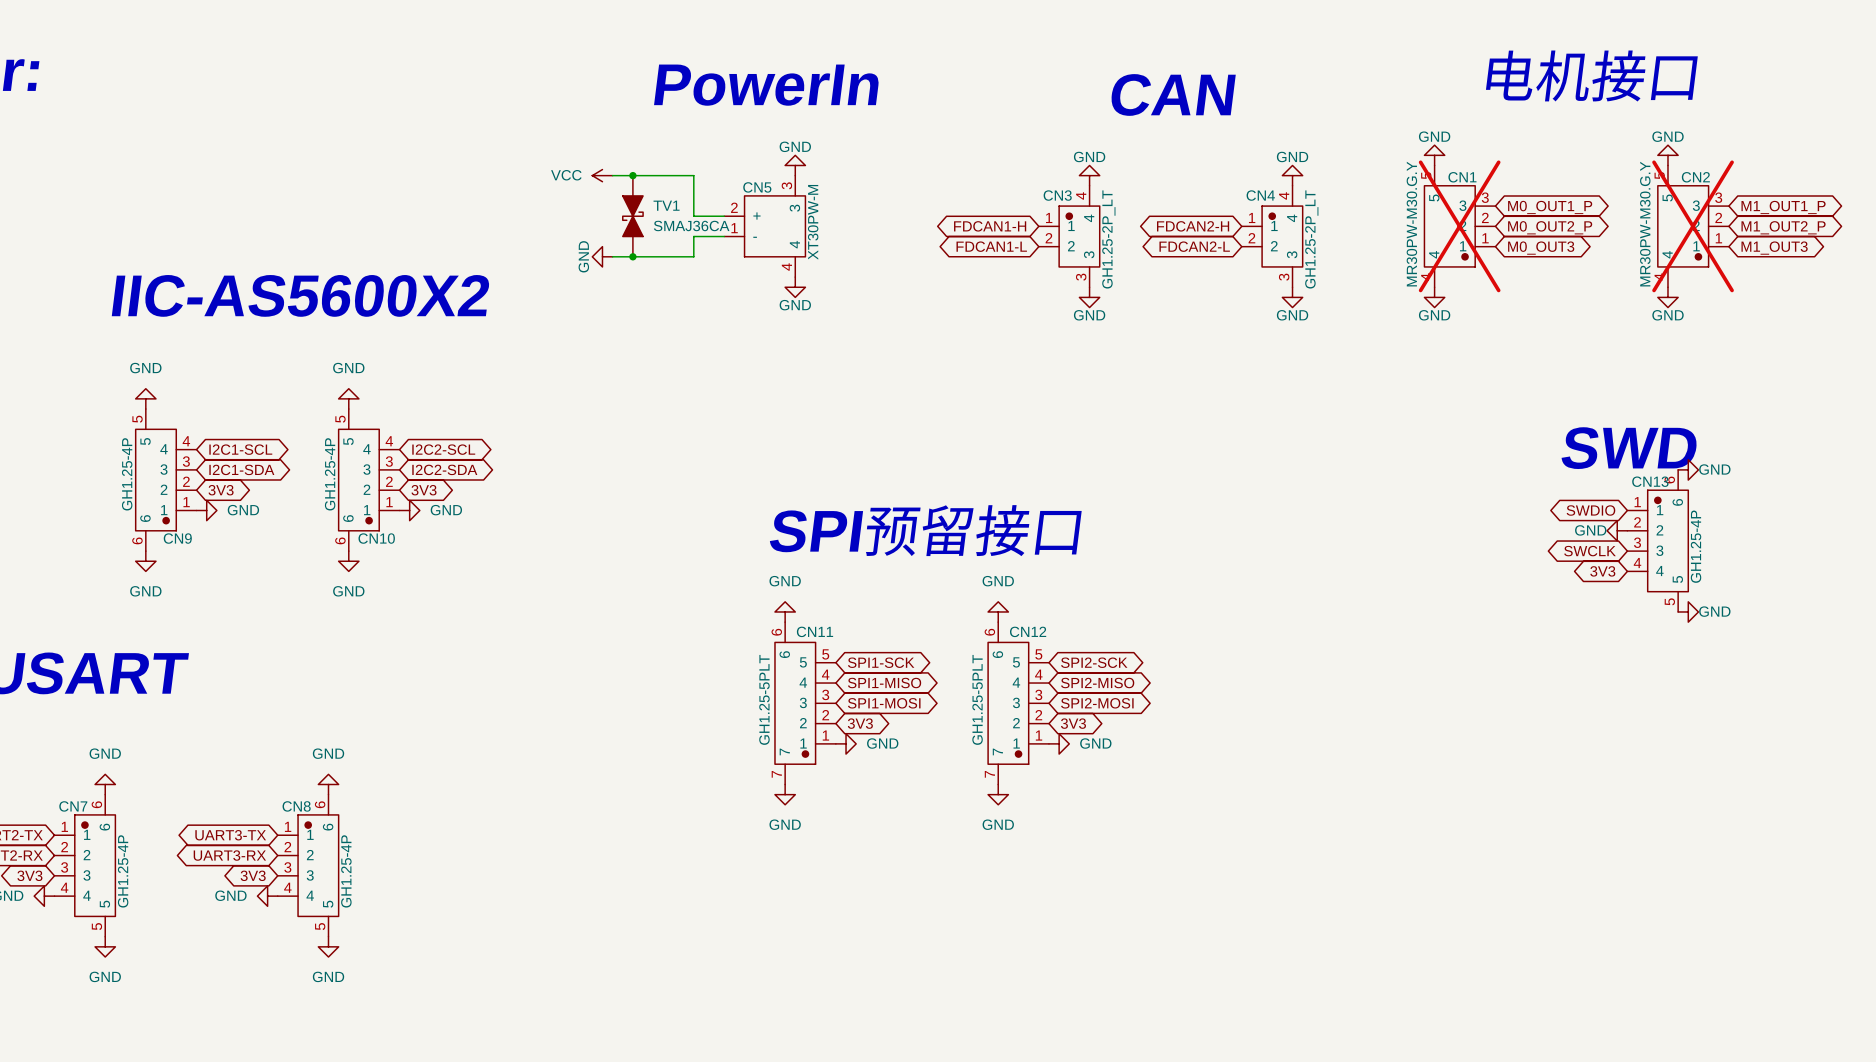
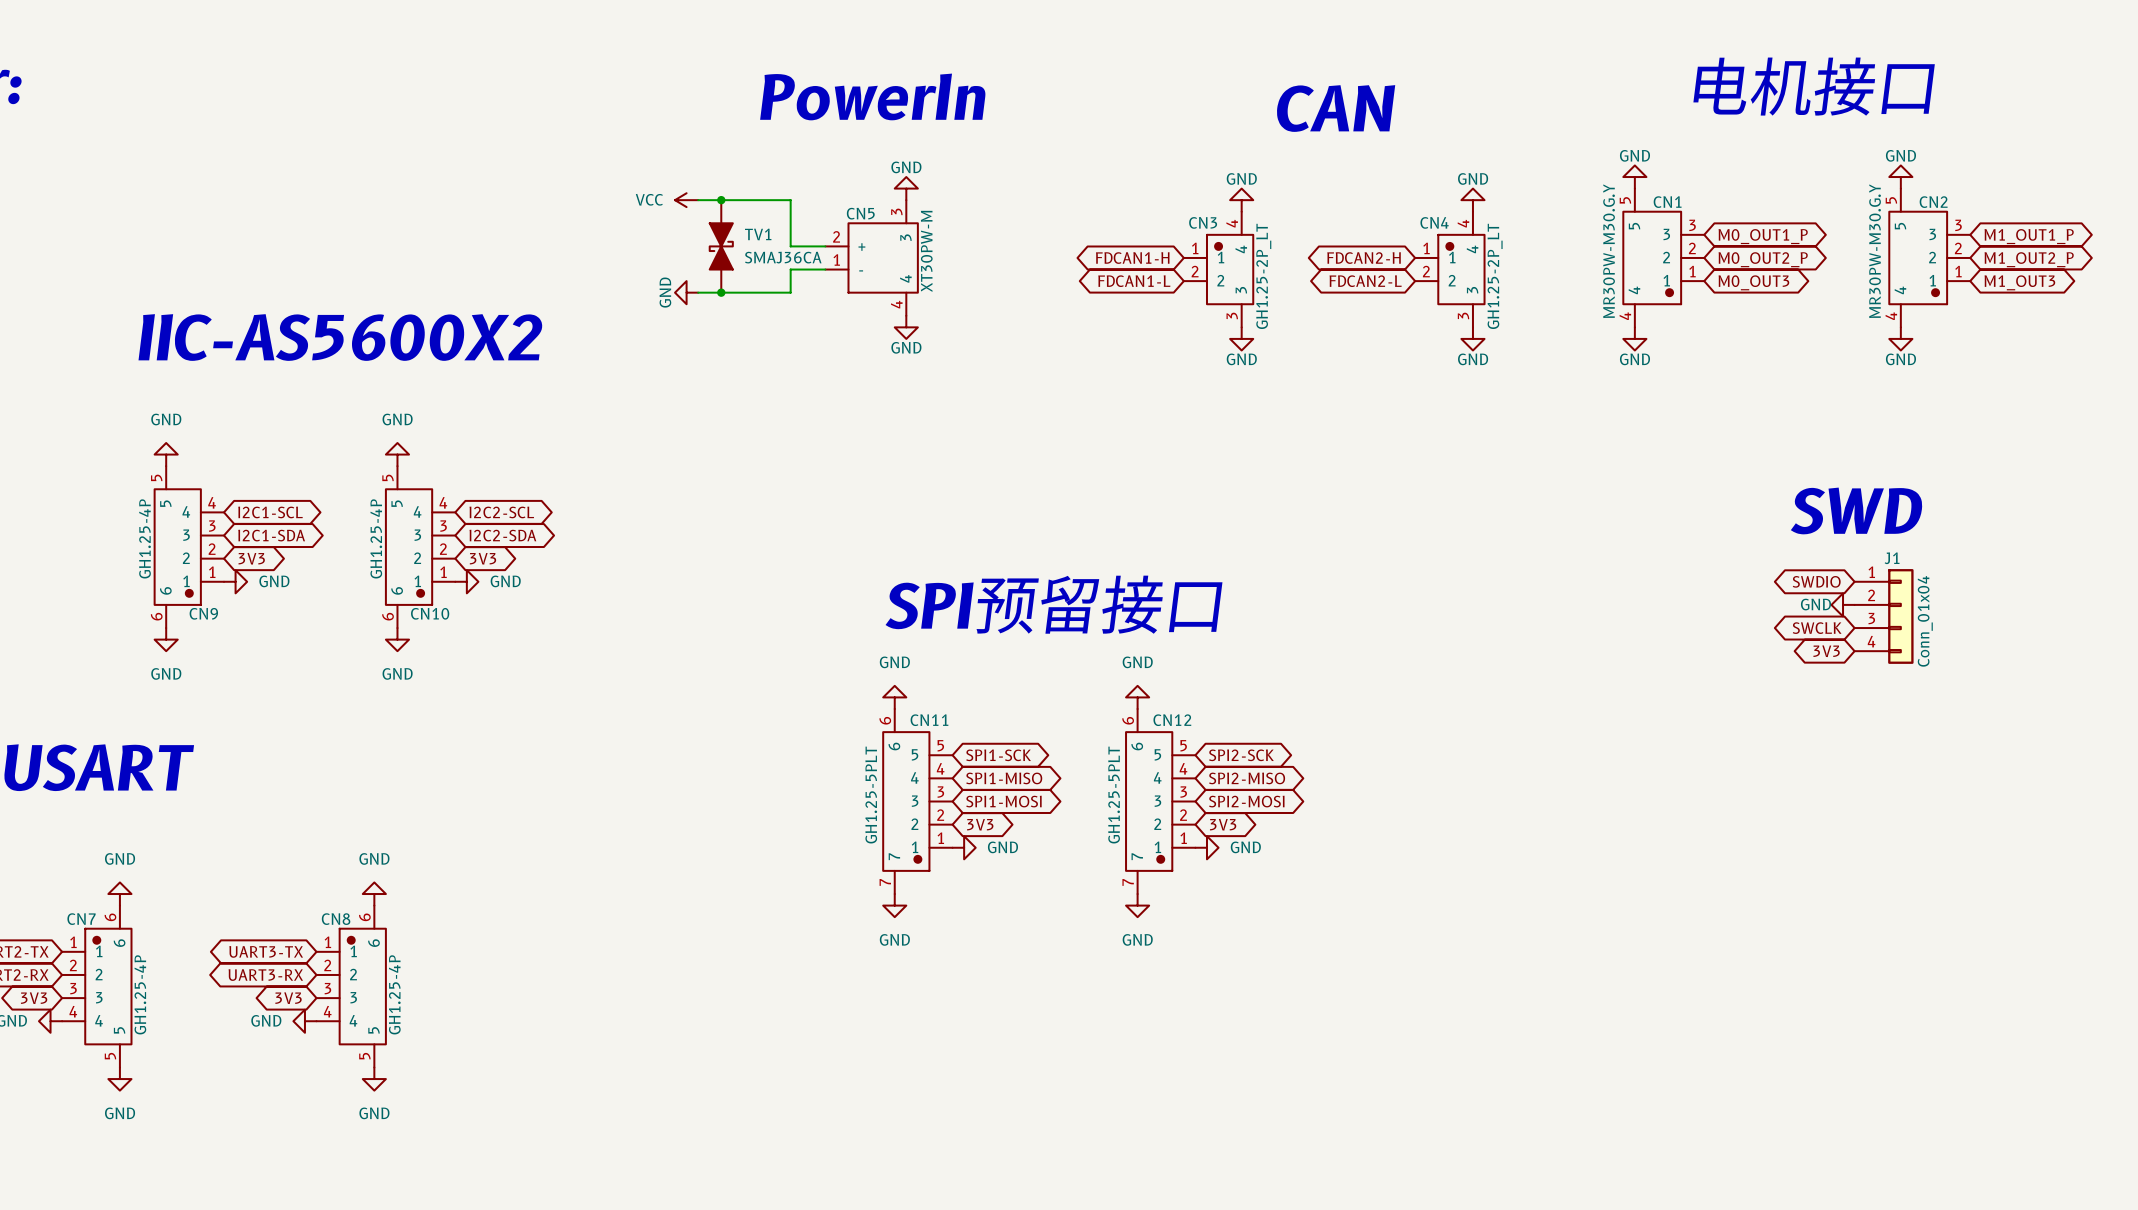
CN1 do-not-place cross: (1459, 226) -> none
CN2 do-not-place cross: (1693, 226) -> none
power symbol: GND (1688, 469) -> none
J1: none -> Conn_01x04 (1884, 616)
CN13: GH1.25-4P (1658, 540) -> none
power symbol: GND (1688, 611) -> none

